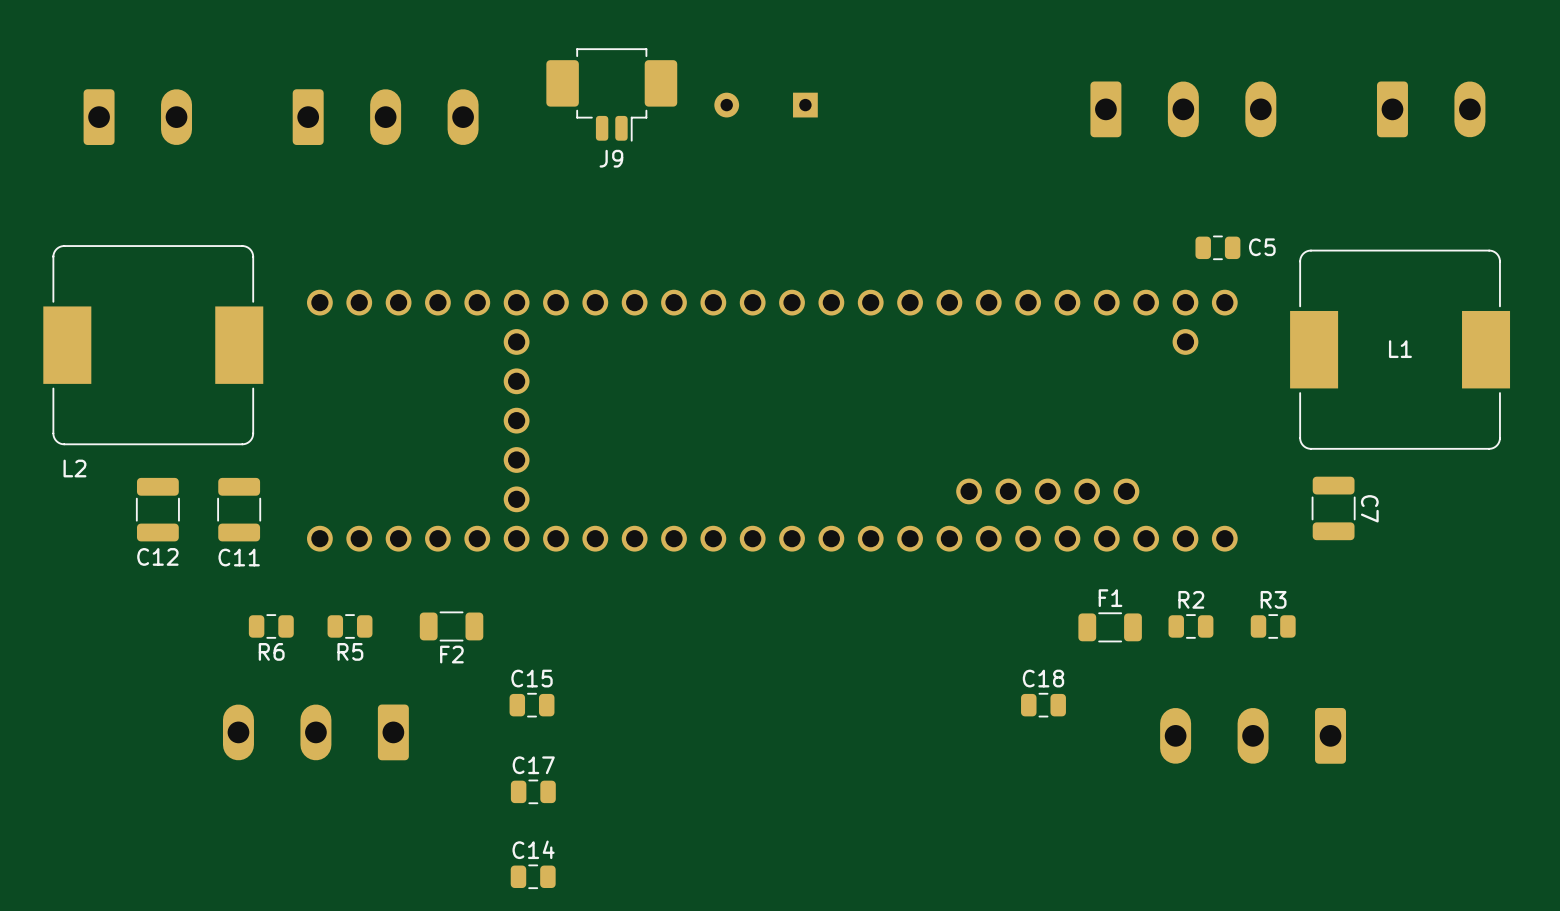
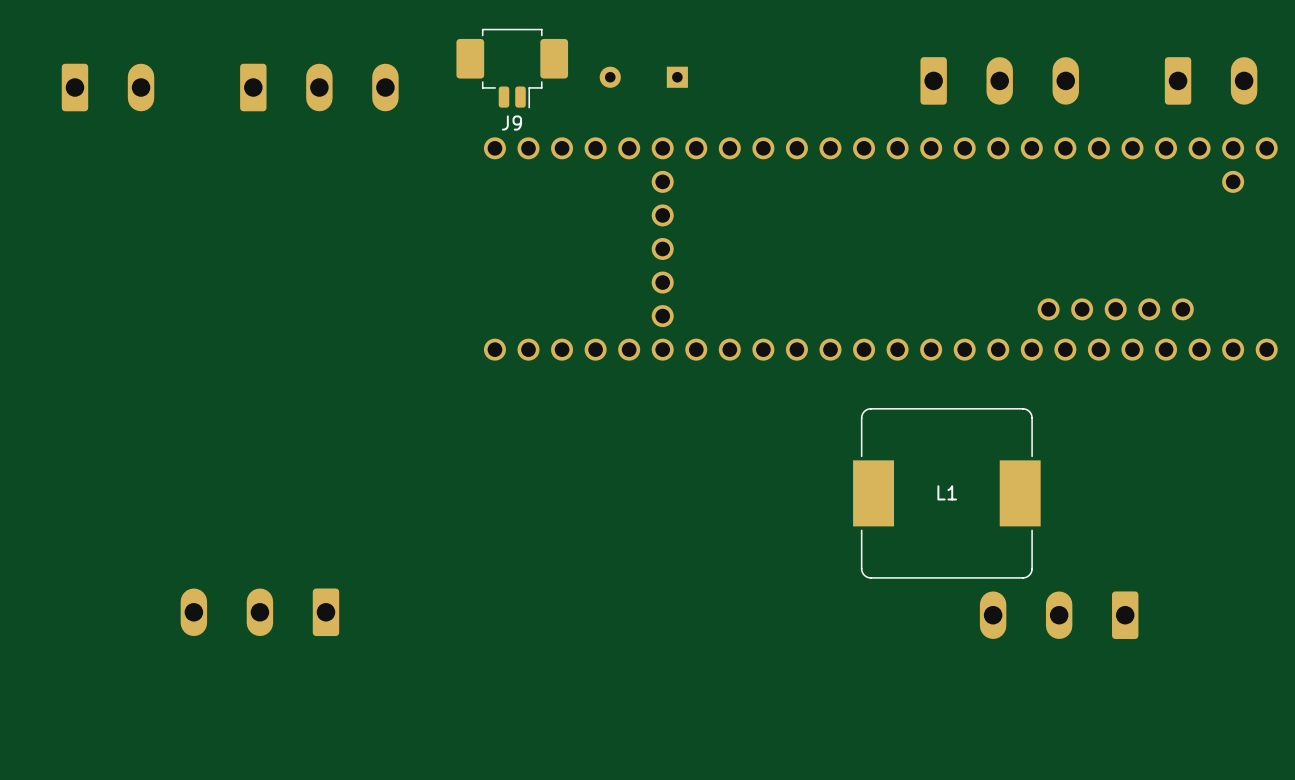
C5: (1217, 247) -> none
L2: (153, 345) -> none
L1 position: (1400, 349) -> (946, 493)
part position: (772, 420) -> (880, 248)
C7: (1333, 508) -> none
C12: (157, 509) -> none
C11: (239, 509) -> none
R6: (271, 626) -> none
R5: (350, 626) -> none
F2: (451, 626) -> none
R2: (1190, 626) -> none
R3: (1273, 626) -> none
F1: (1110, 627) -> none
C15: (532, 705) -> none
C18: (1043, 705) -> none
C17: (533, 791) -> none
C14: (533, 876) -> none

